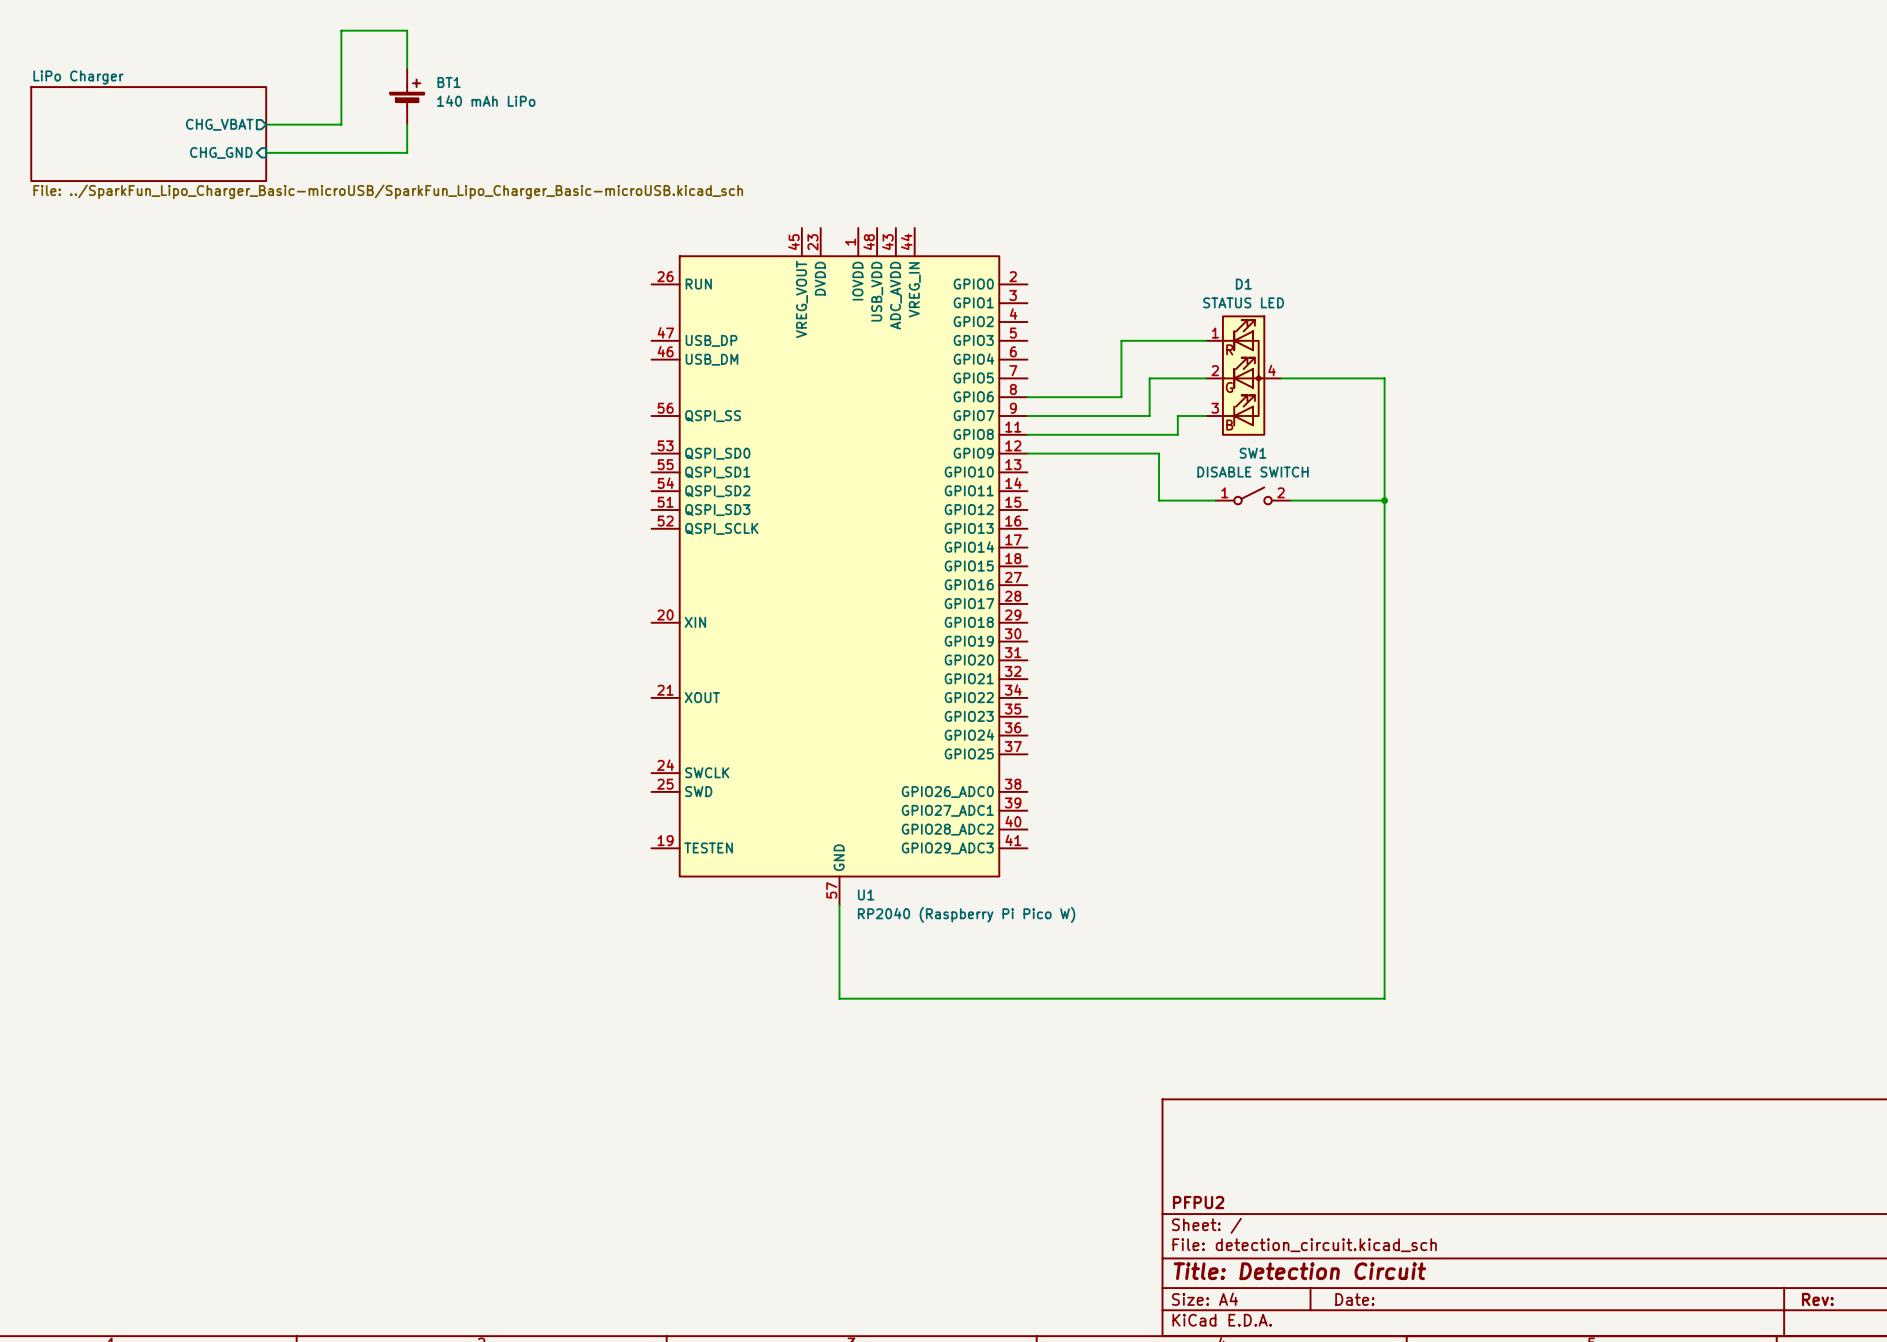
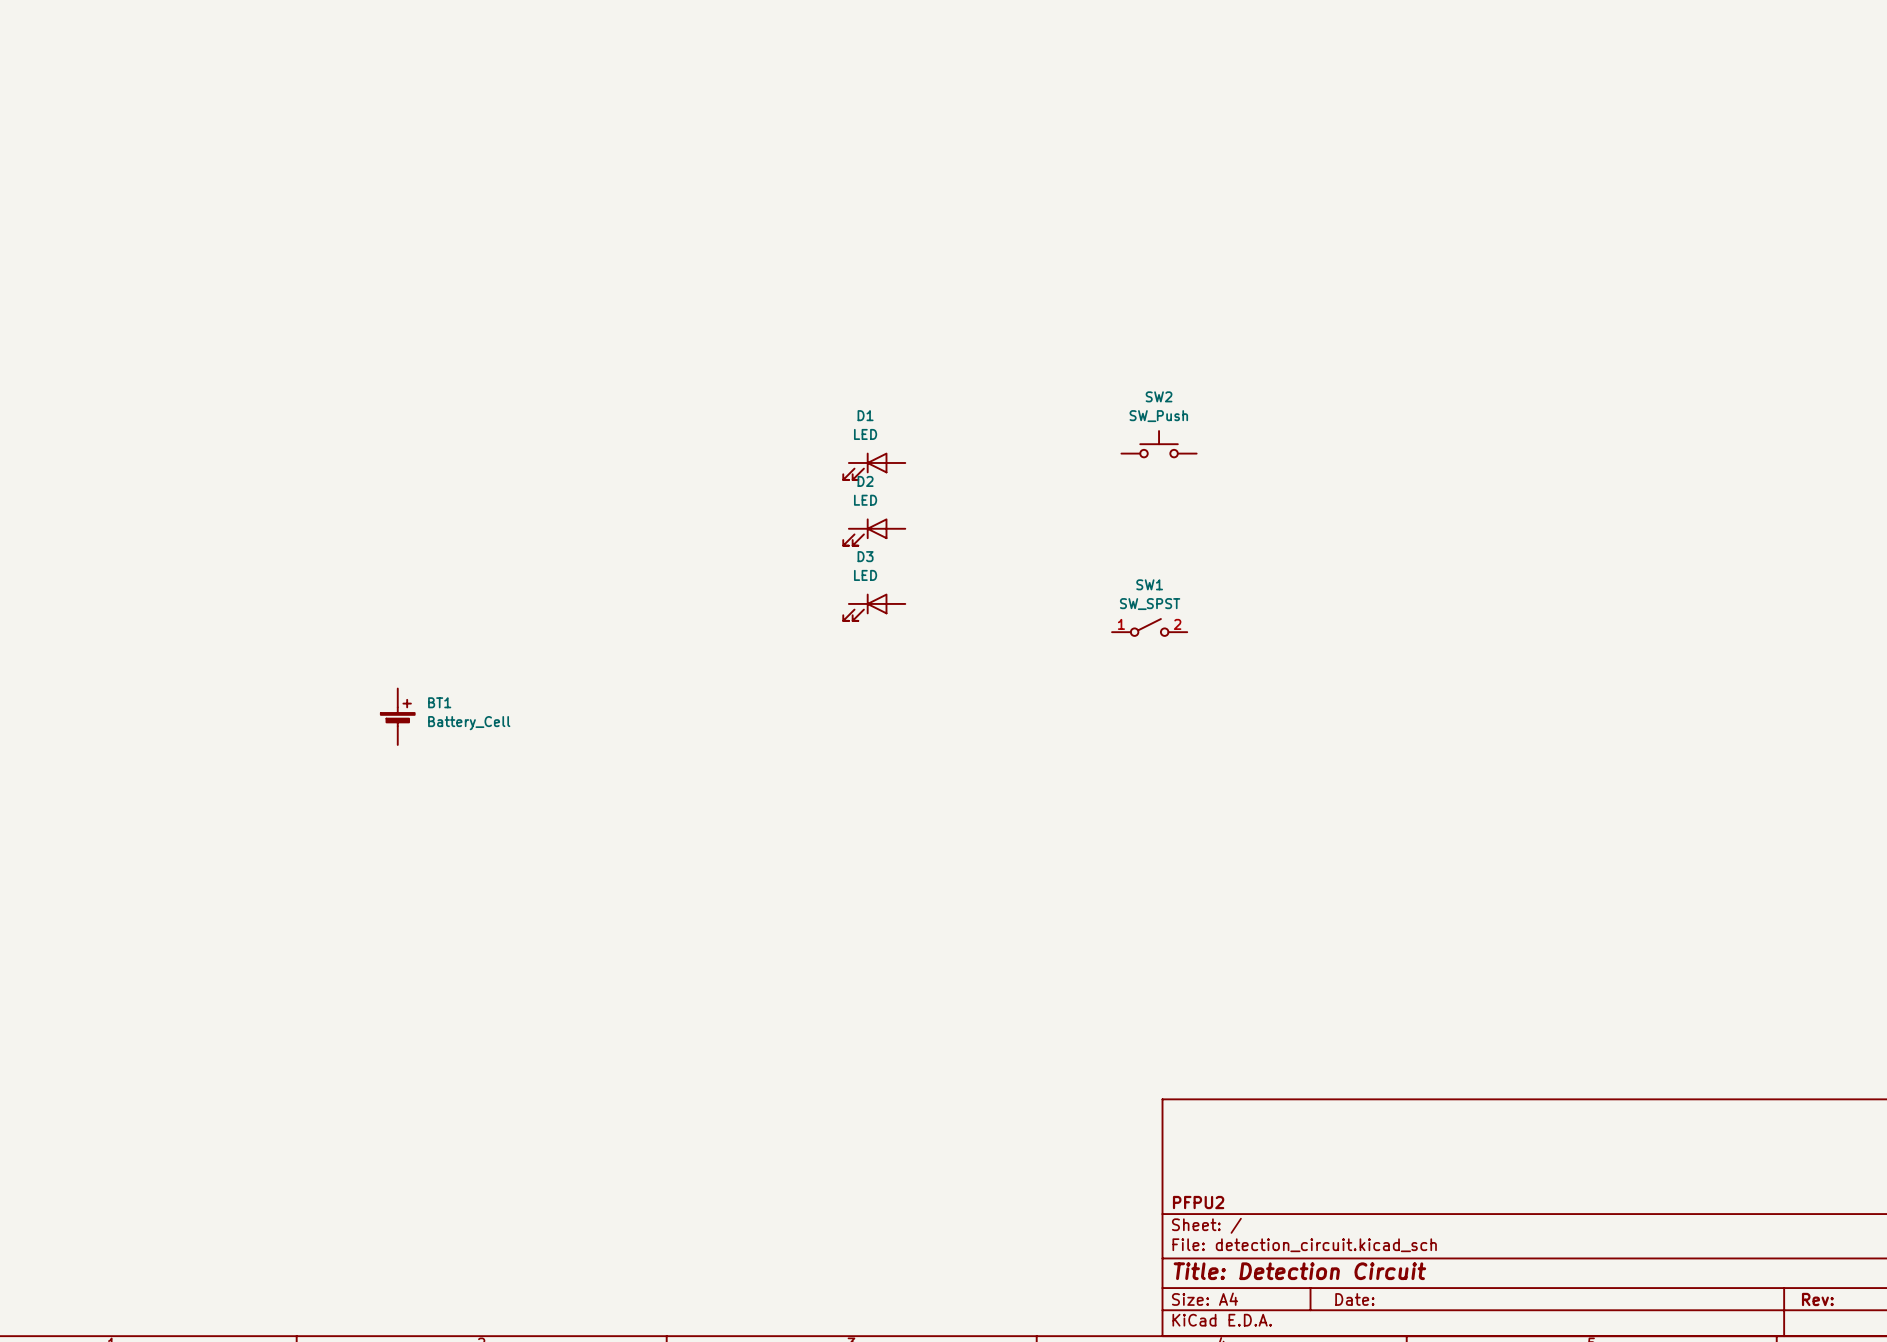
wire: (407, 68) (407, 30) (341, 30) (341, 124) (266, 124) -> none
BT1 position: (407, 96) -> (397, 716)
BT1 value: 140 mAh LiPo (486, 101) -> Battery_Cell (469, 723)
sheet pin: CHG_VBAT (219, 124) -> none
wire: (407, 124) (407, 152) (266, 152) -> none
sheet LiPo Charger: File: ../SparkFun_Lipo_Charger_Basic-microUSB/SparkFun_Lipo_Charger_Basic-microUSB.kicad_sch (148, 134) -> none
sheet pin: CHG_GND (221, 152) -> none
D1 name position: D1 (1243, 284) -> D1 (865, 415)
D1 value: STATUS LED (1243, 302) -> LED (865, 434)
D1 symbol: [1206, 315, 1282, 436] -> [843, 452, 906, 480]
wire: (1206, 340) (1121, 340) (1121, 397) (1027, 397) -> none
wire: (1206, 378) (1149, 378) (1149, 416) (1027, 416) -> none
wire: (1281, 378) (1384, 378) (1384, 998) (839, 998) (839, 904) -> none
wire: (1206, 416) (1177, 416) (1177, 434) (1027, 434) -> none
SW2: none -> SW_Push (1159, 444)
wire: (1027, 453) (1159, 453) (1159, 500) (1215, 500) -> none
SW1 value: DISABLE SWITCH (1253, 472) -> SW_SPST (1150, 604)
SW1 position: (1253, 495) -> (1149, 627)
wire: (1290, 500) (1384, 500) -> none
junction: (1384, 500) -> none
D2: none -> LED (874, 532)
U1: RP2040 (Raspberry Pi Pico W) (839, 566) -> none
D3: none -> LED (874, 607)

